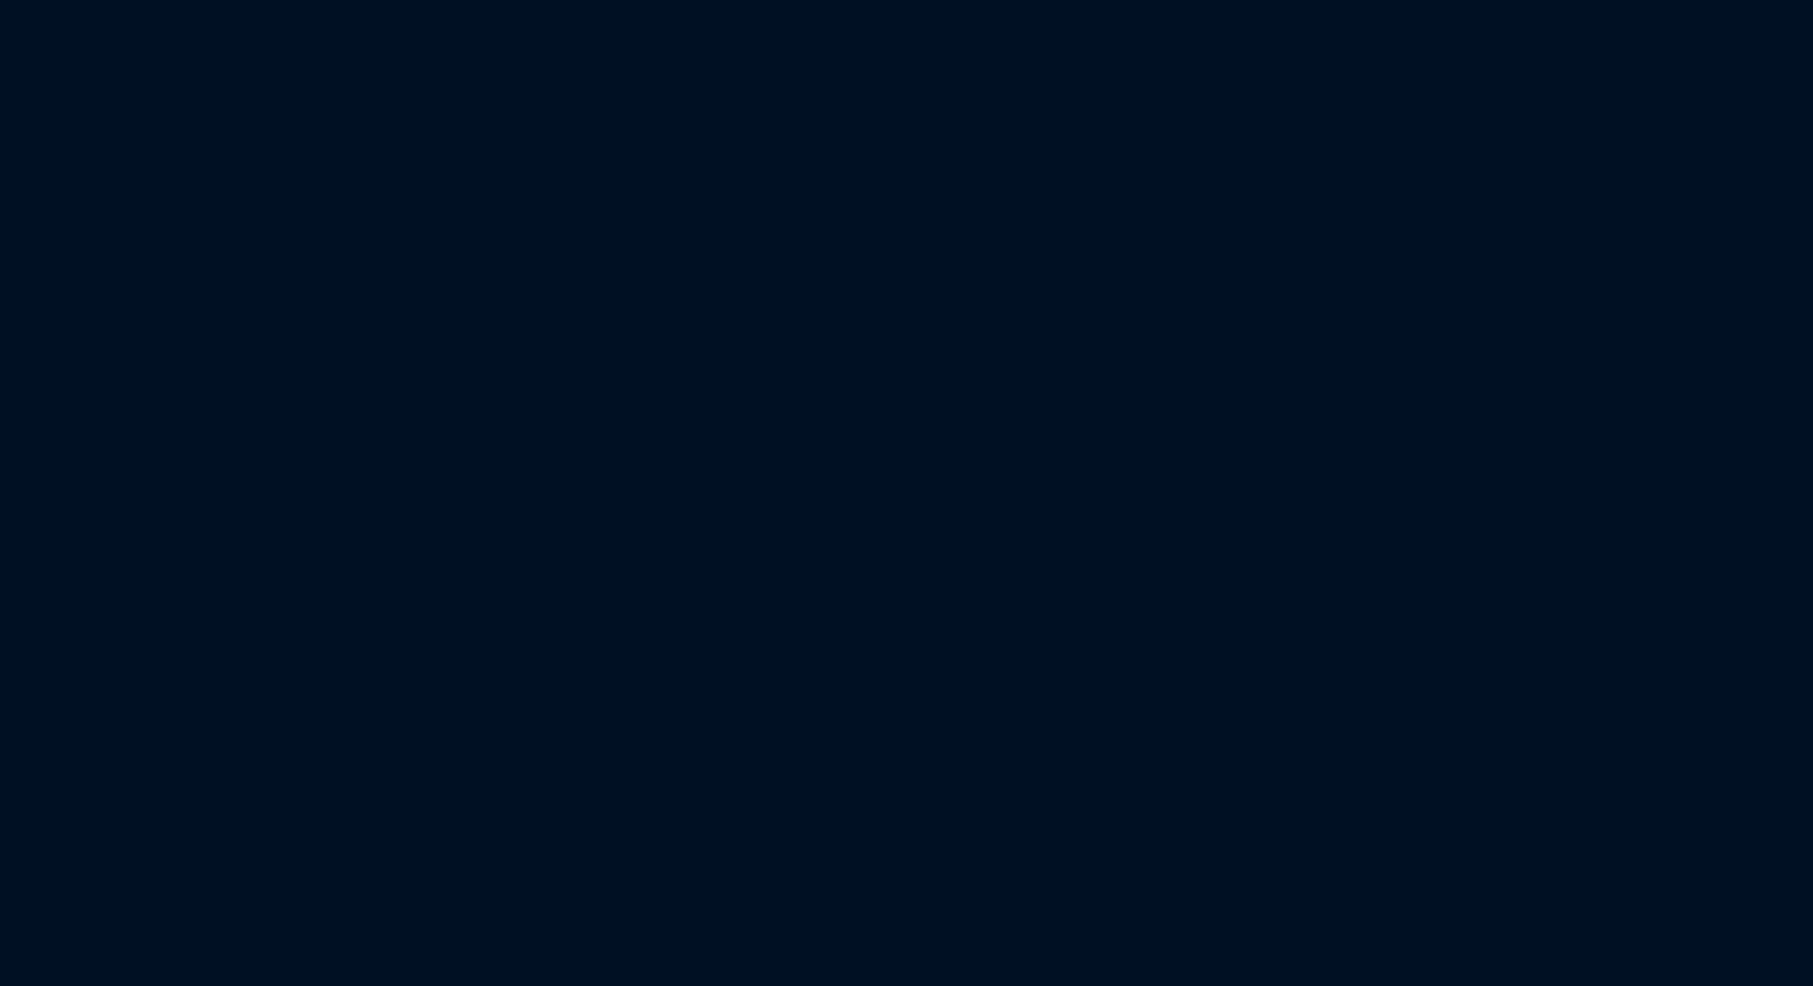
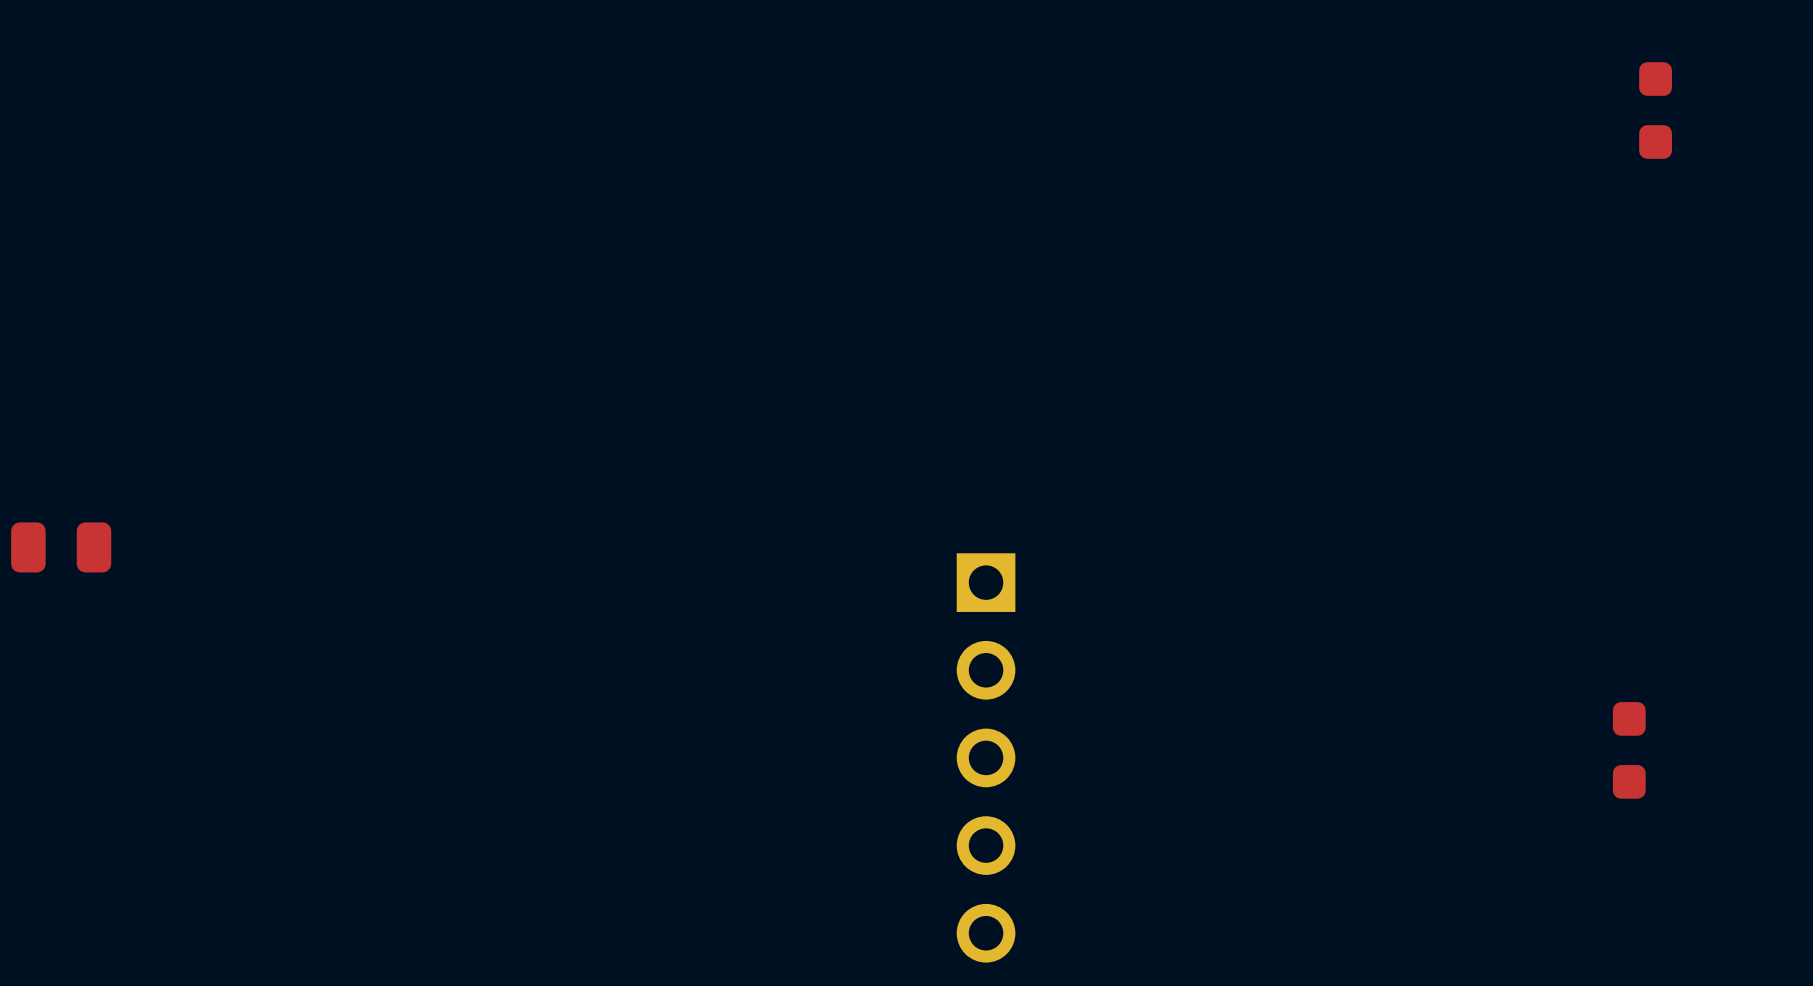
part: none -> (1655, 110)
part: none -> (61, 547)
part: none -> (1629, 750)
part: none -> (986, 757)

